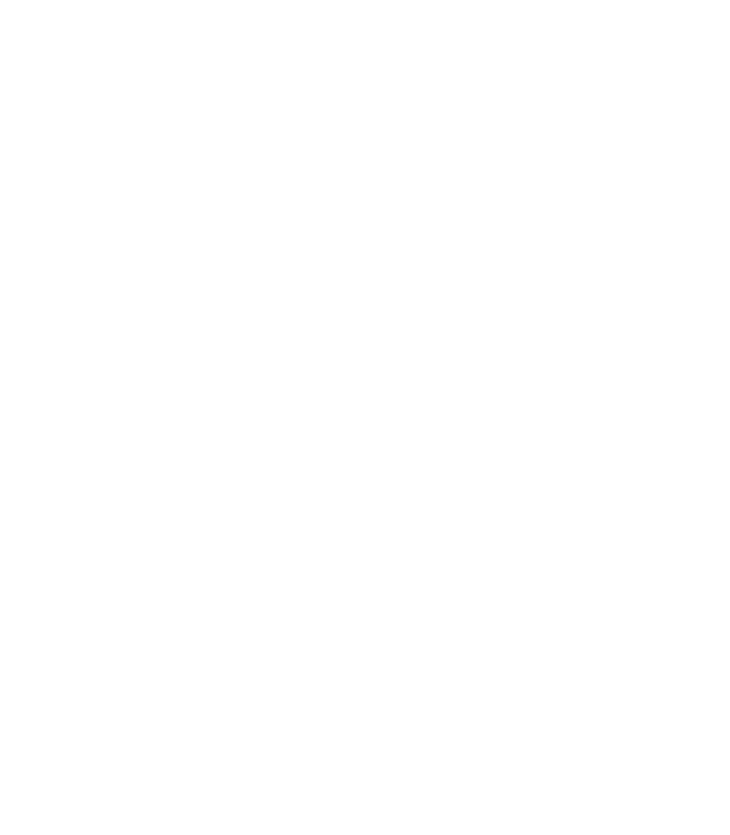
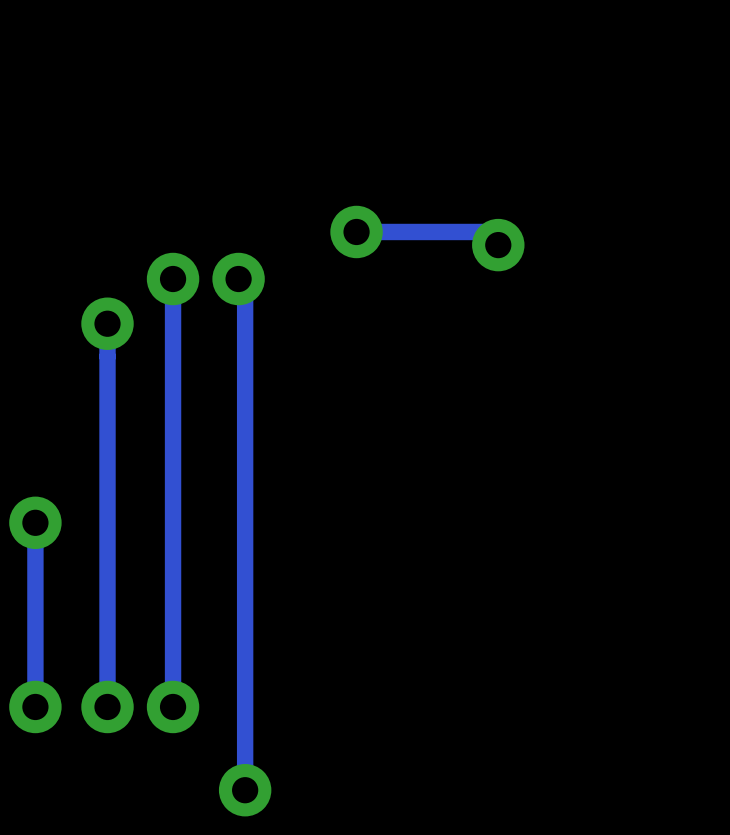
track: none -> (356, 231) (485, 231) (498, 245)
via: none -> (356, 231)
via: none -> (498, 245)
track: none -> (173, 279) (173, 706)
via: none -> (173, 279)
track: none -> (238, 279) (245, 285) (245, 790)
via: none -> (238, 279)
track: none -> (107, 323) (107, 706)
via: none -> (107, 323)
track: none -> (35, 522) (35, 706)
via: none -> (35, 522)
via: none -> (35, 706)
via: none -> (107, 706)
via: none -> (173, 706)
via: none -> (245, 790)

